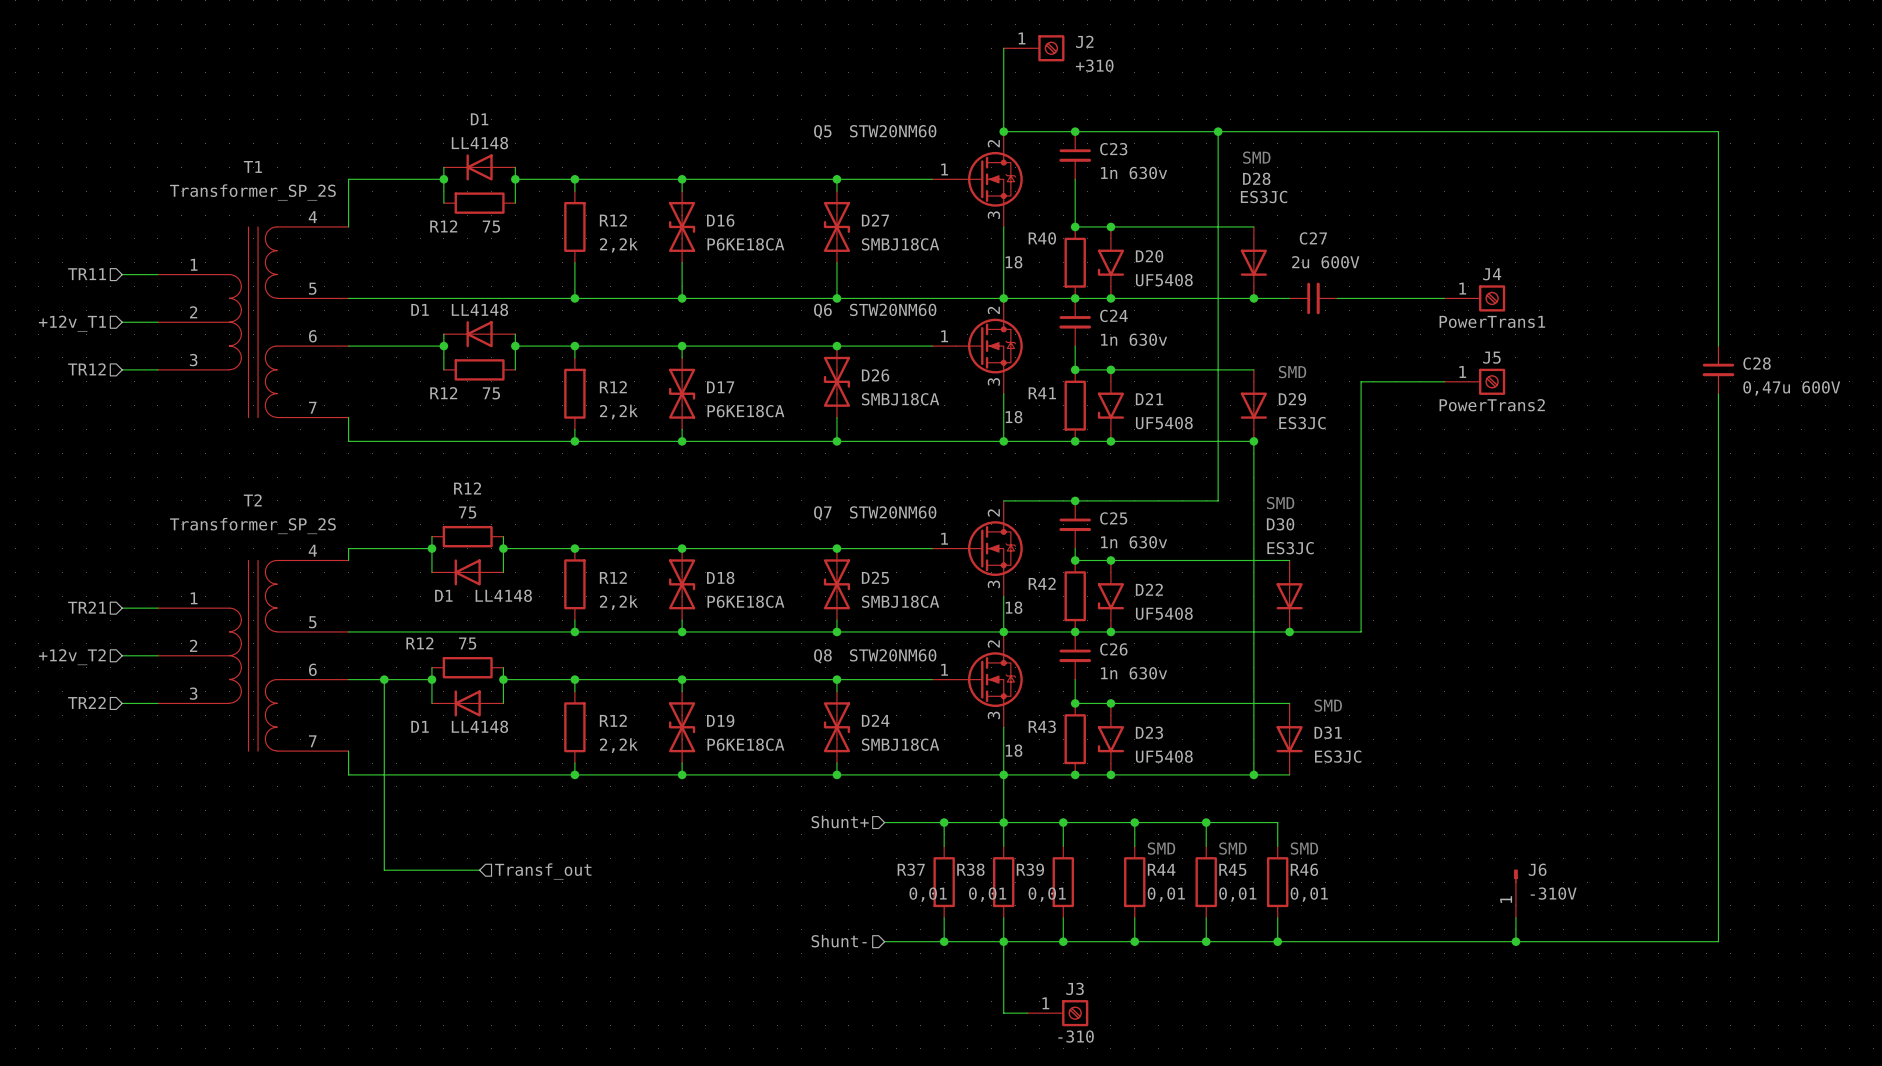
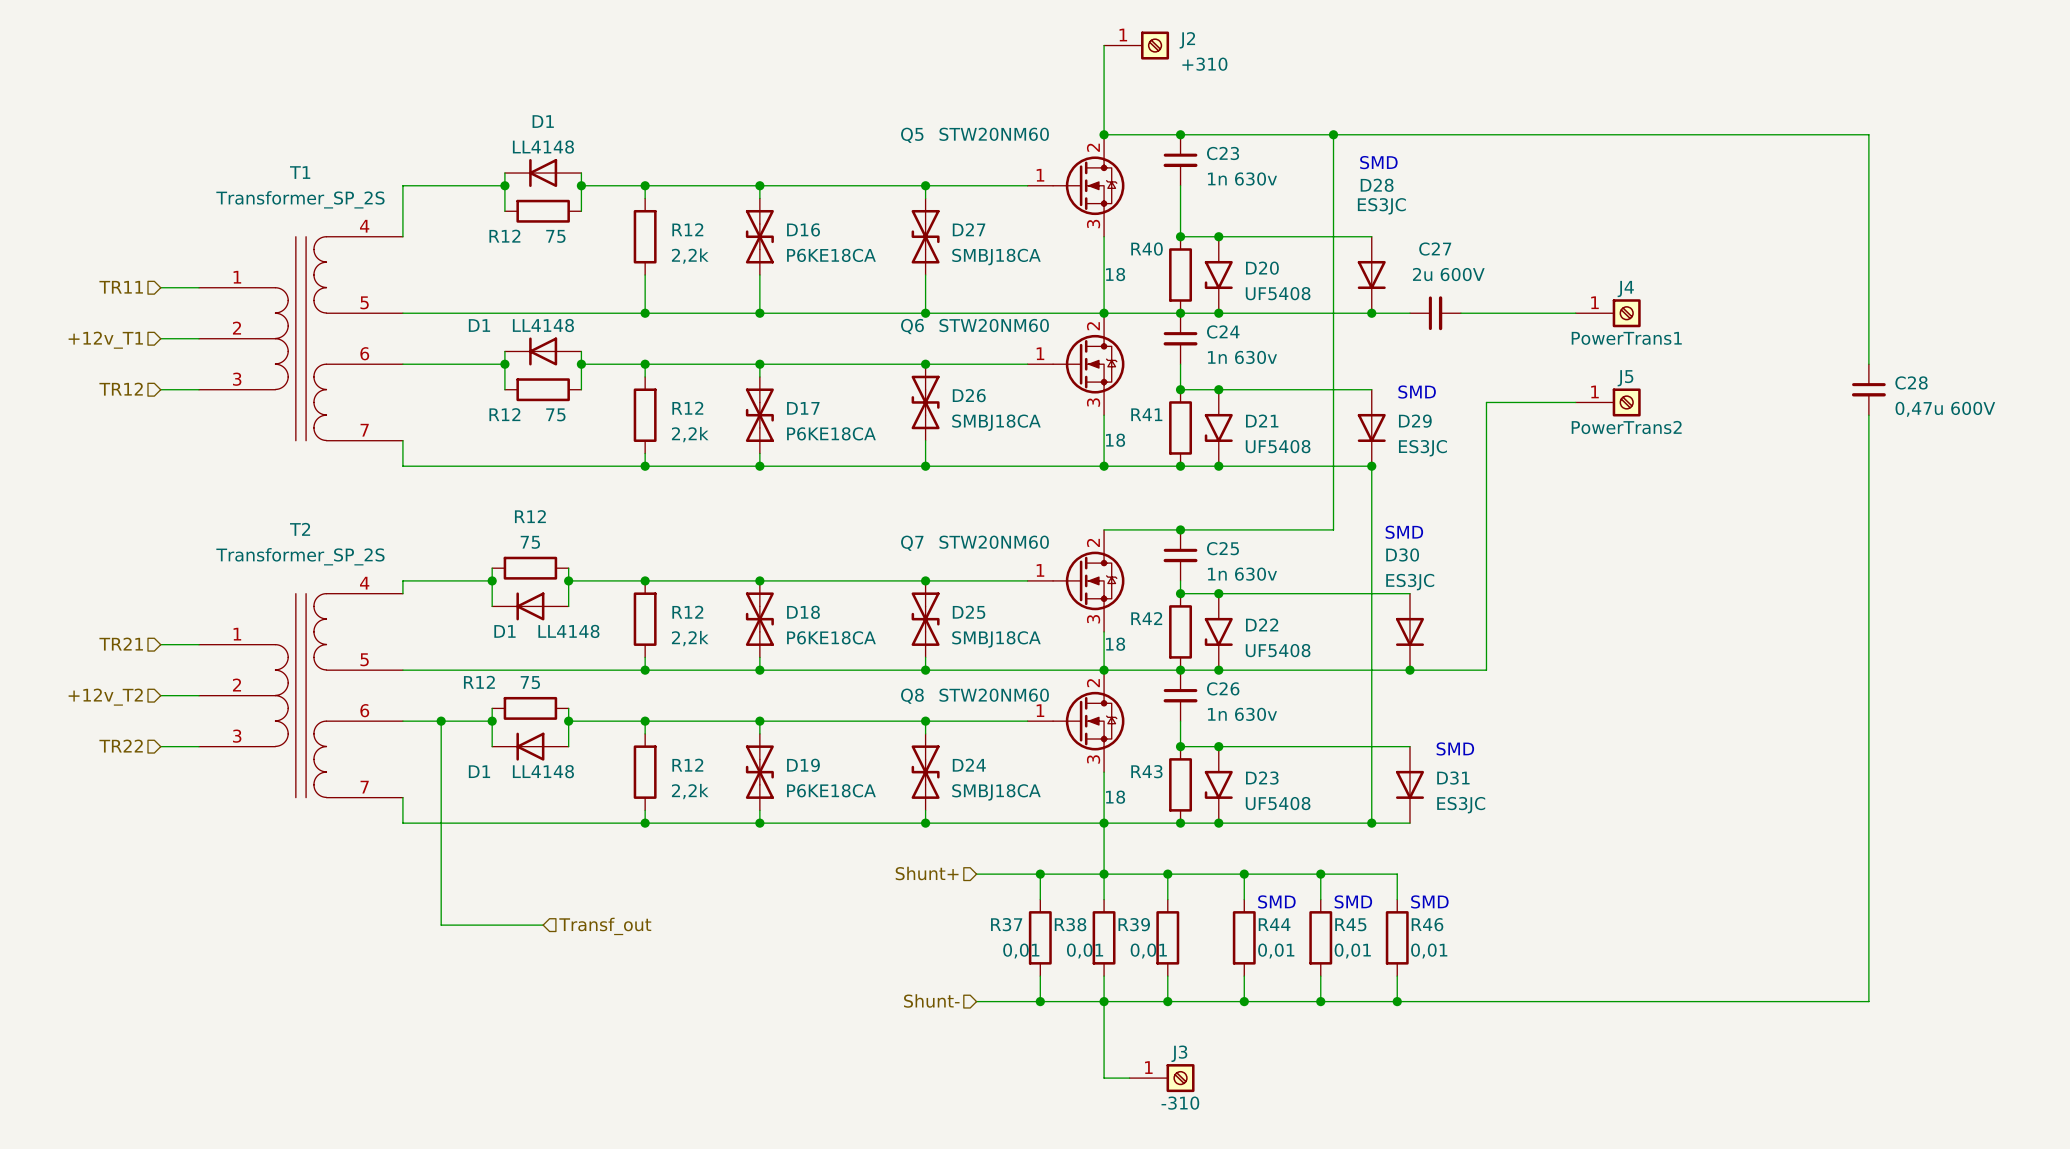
J6: -310V (1515, 893) -> none
wire: (1515, 917) (1515, 941) -> none
junction: (1515, 941) -> none

